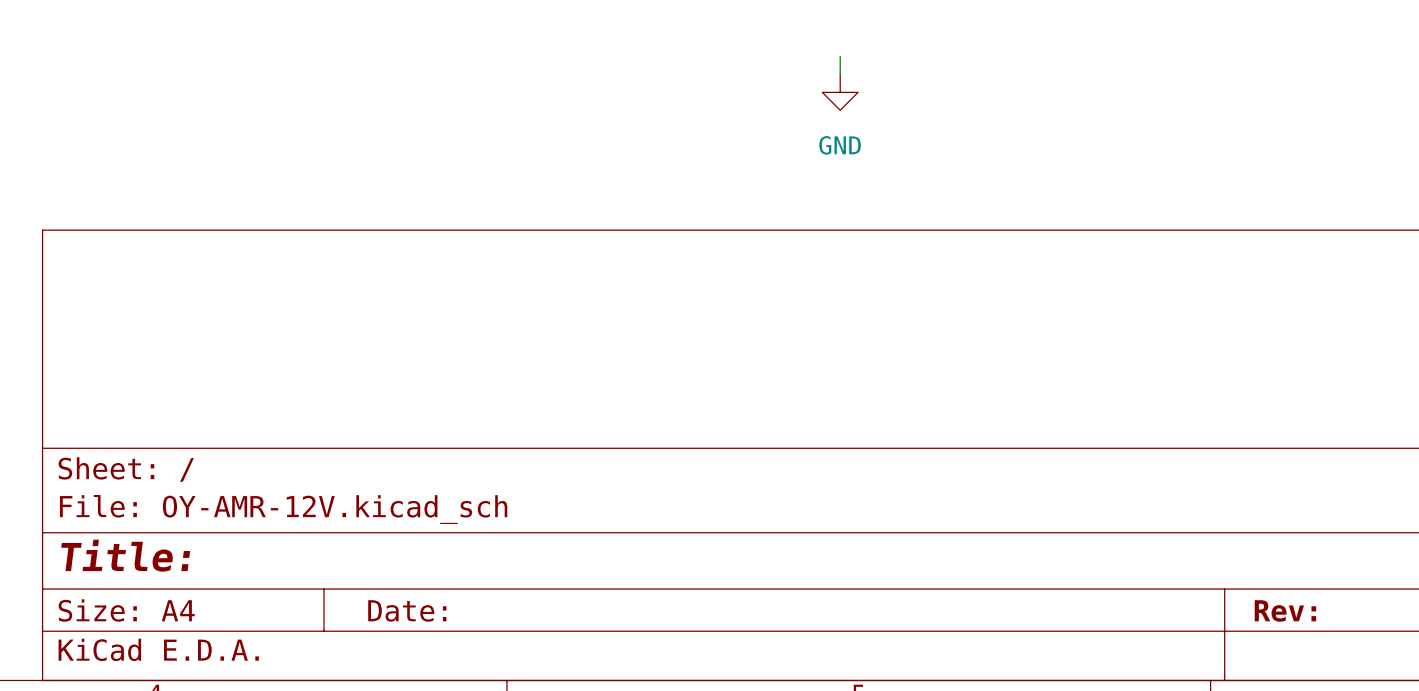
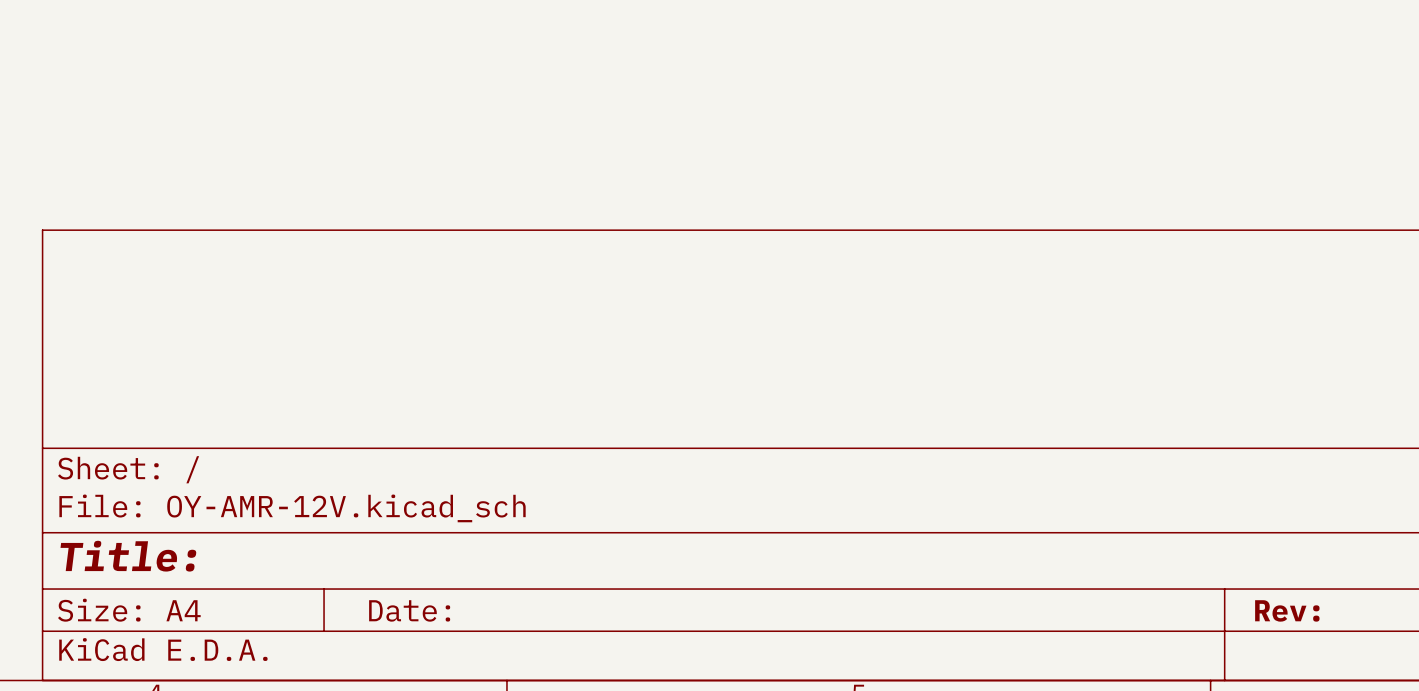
wire: (840, 56) (840, 74) -> none
power symbol: GND (840, 92) -> none

